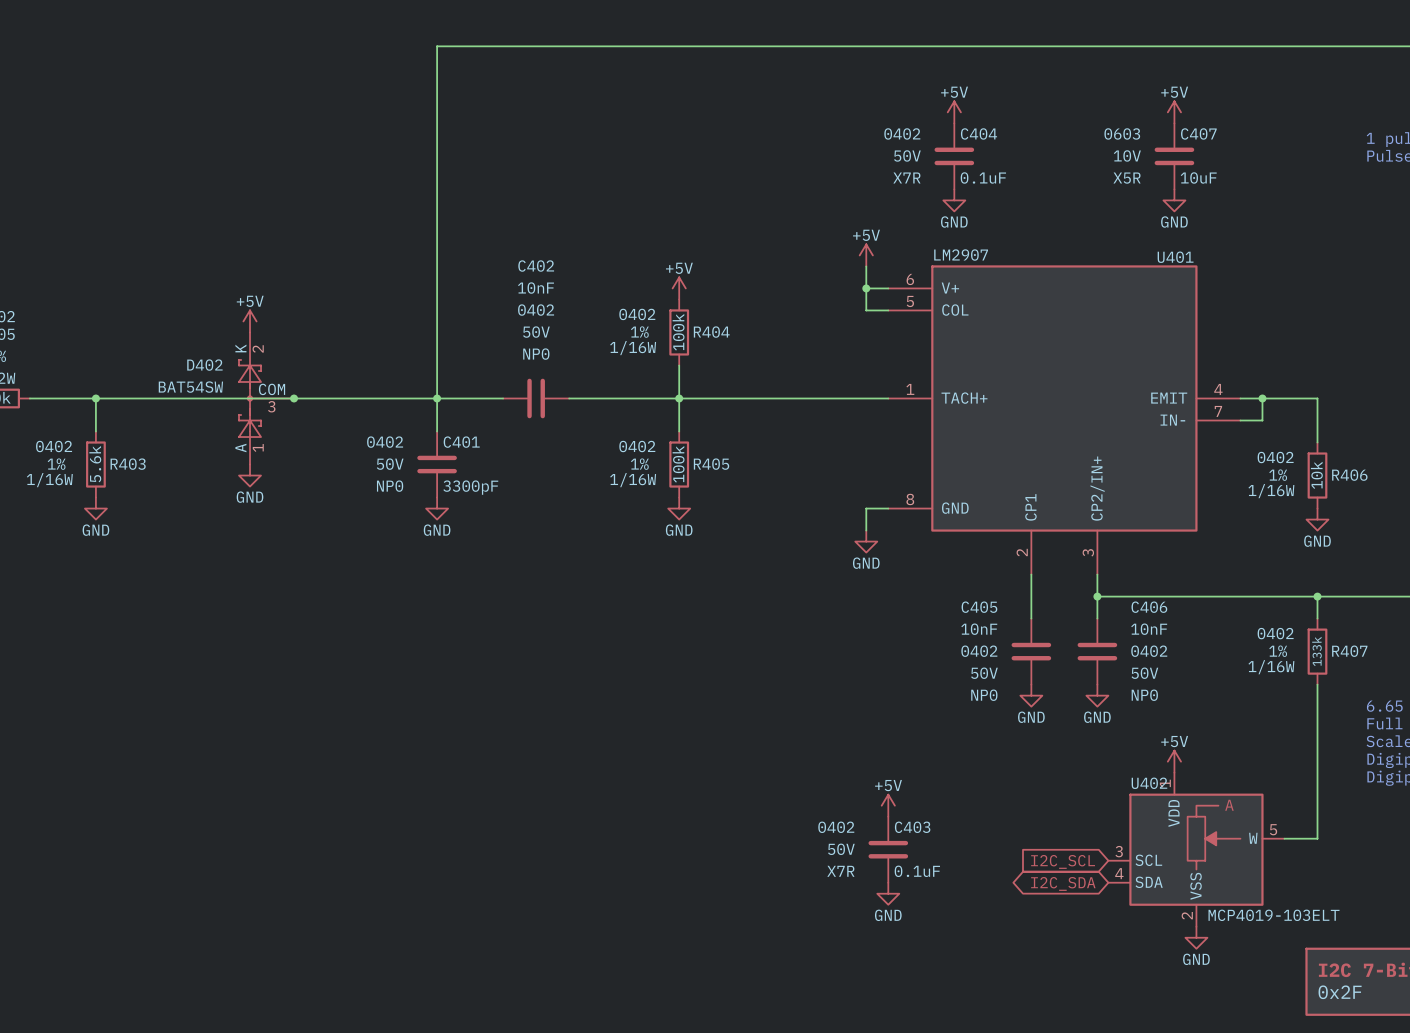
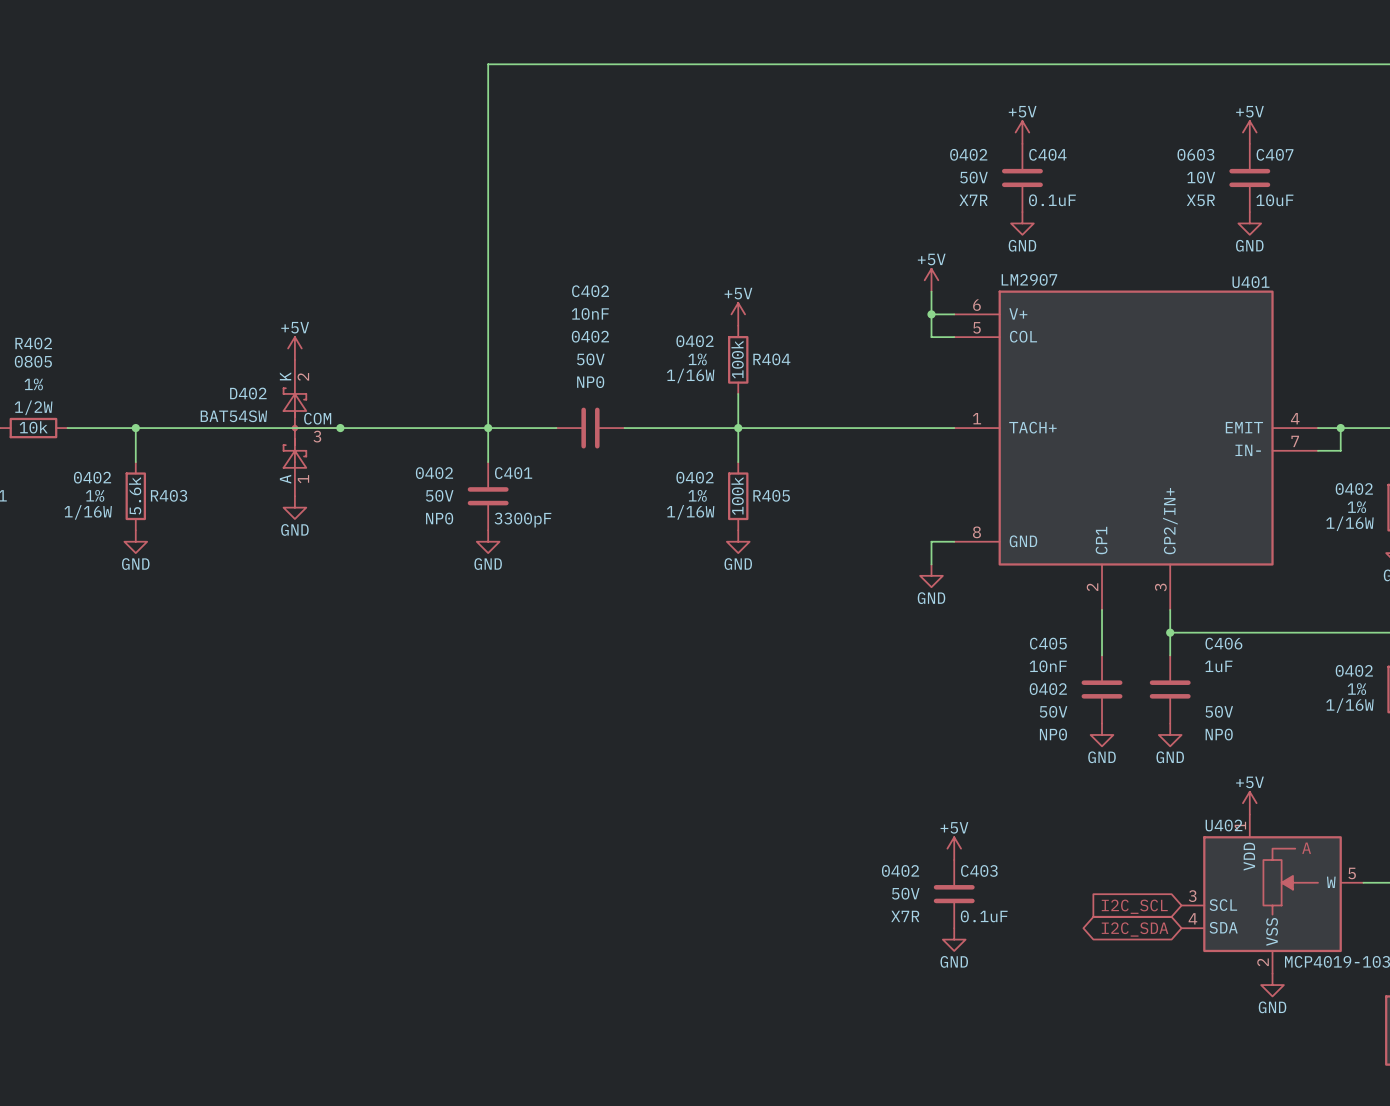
C406 value: 10nF (1149, 629) -> 1uF (1218, 666)
C406 text: 0402 (1149, 651) -> none

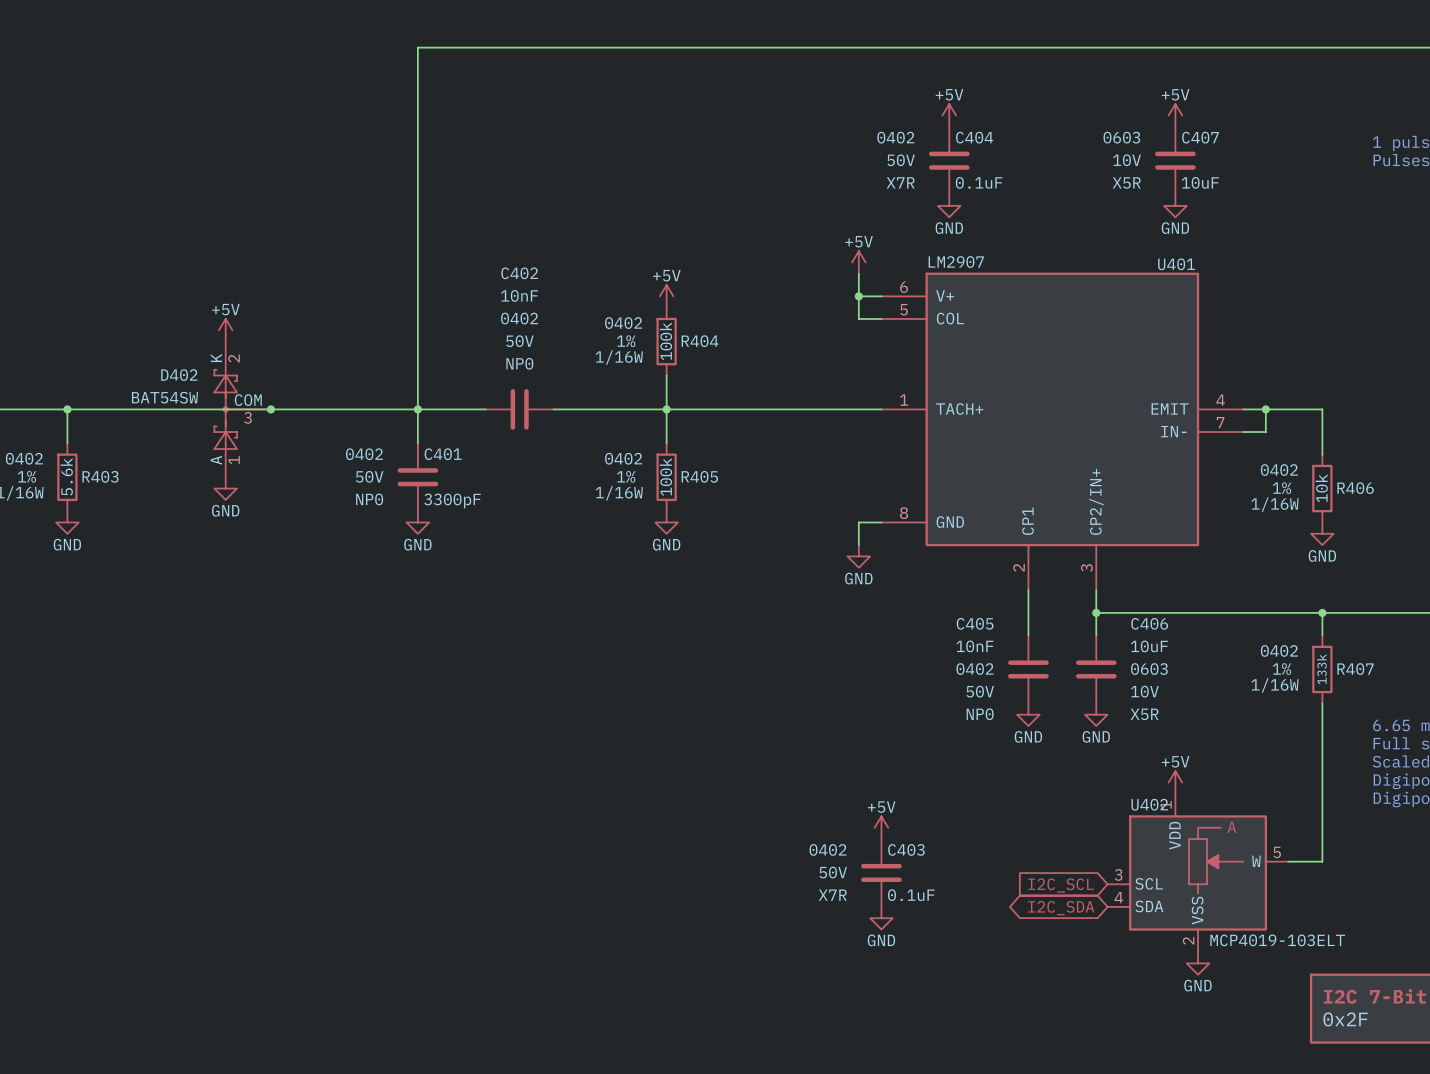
C406 value: 1uF (1218, 666) -> 10uF (1149, 646)
C406 text: none -> 0603 (1149, 669)
C406 text: 50V (1219, 711) -> 10V (1144, 691)
C406 text: NP0 (1219, 734) -> X5R (1144, 714)

